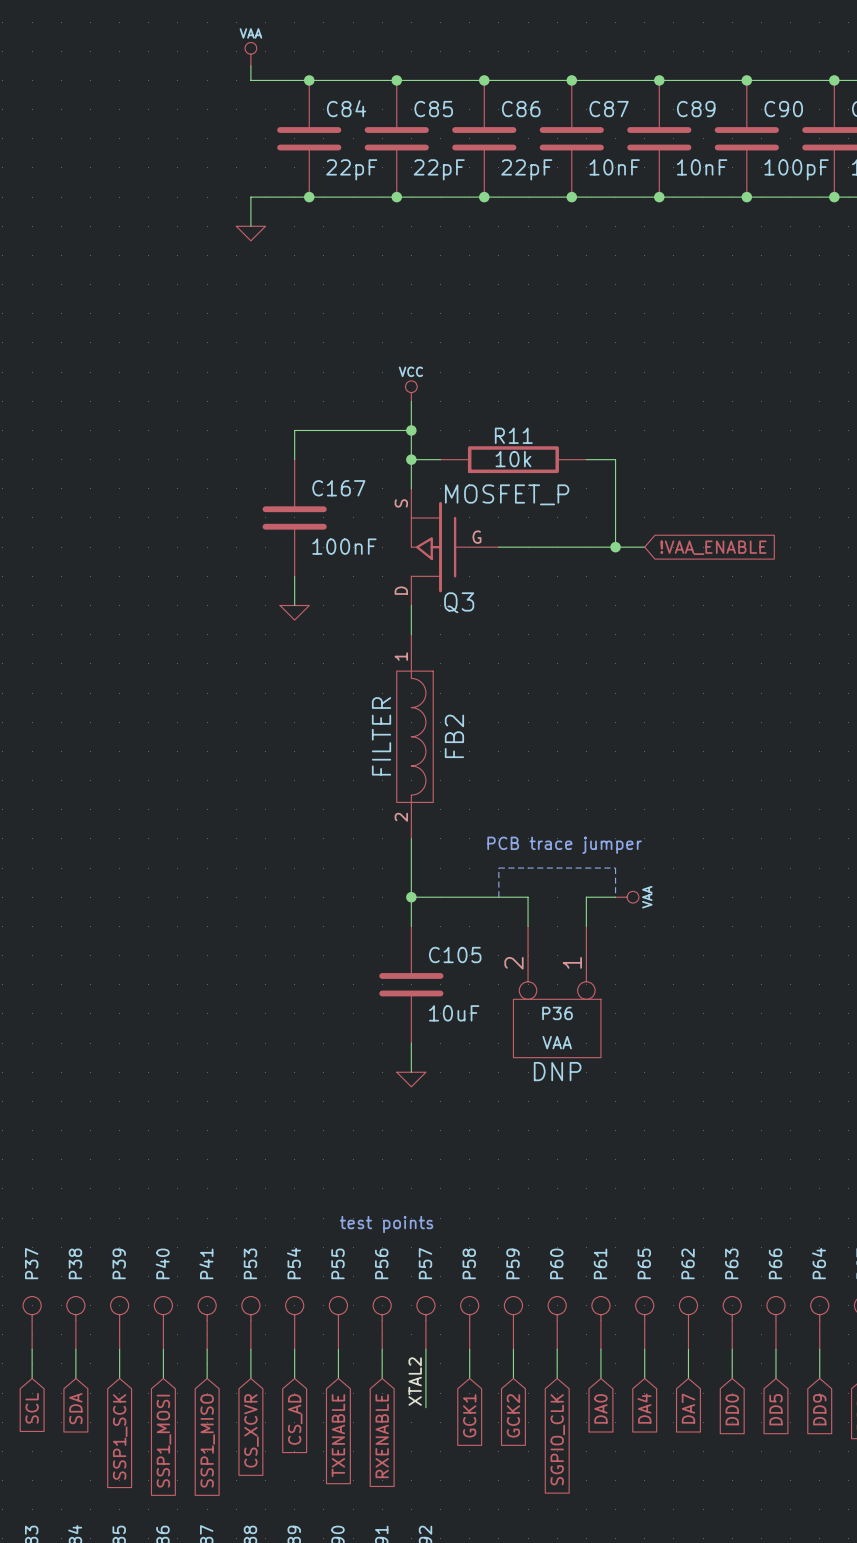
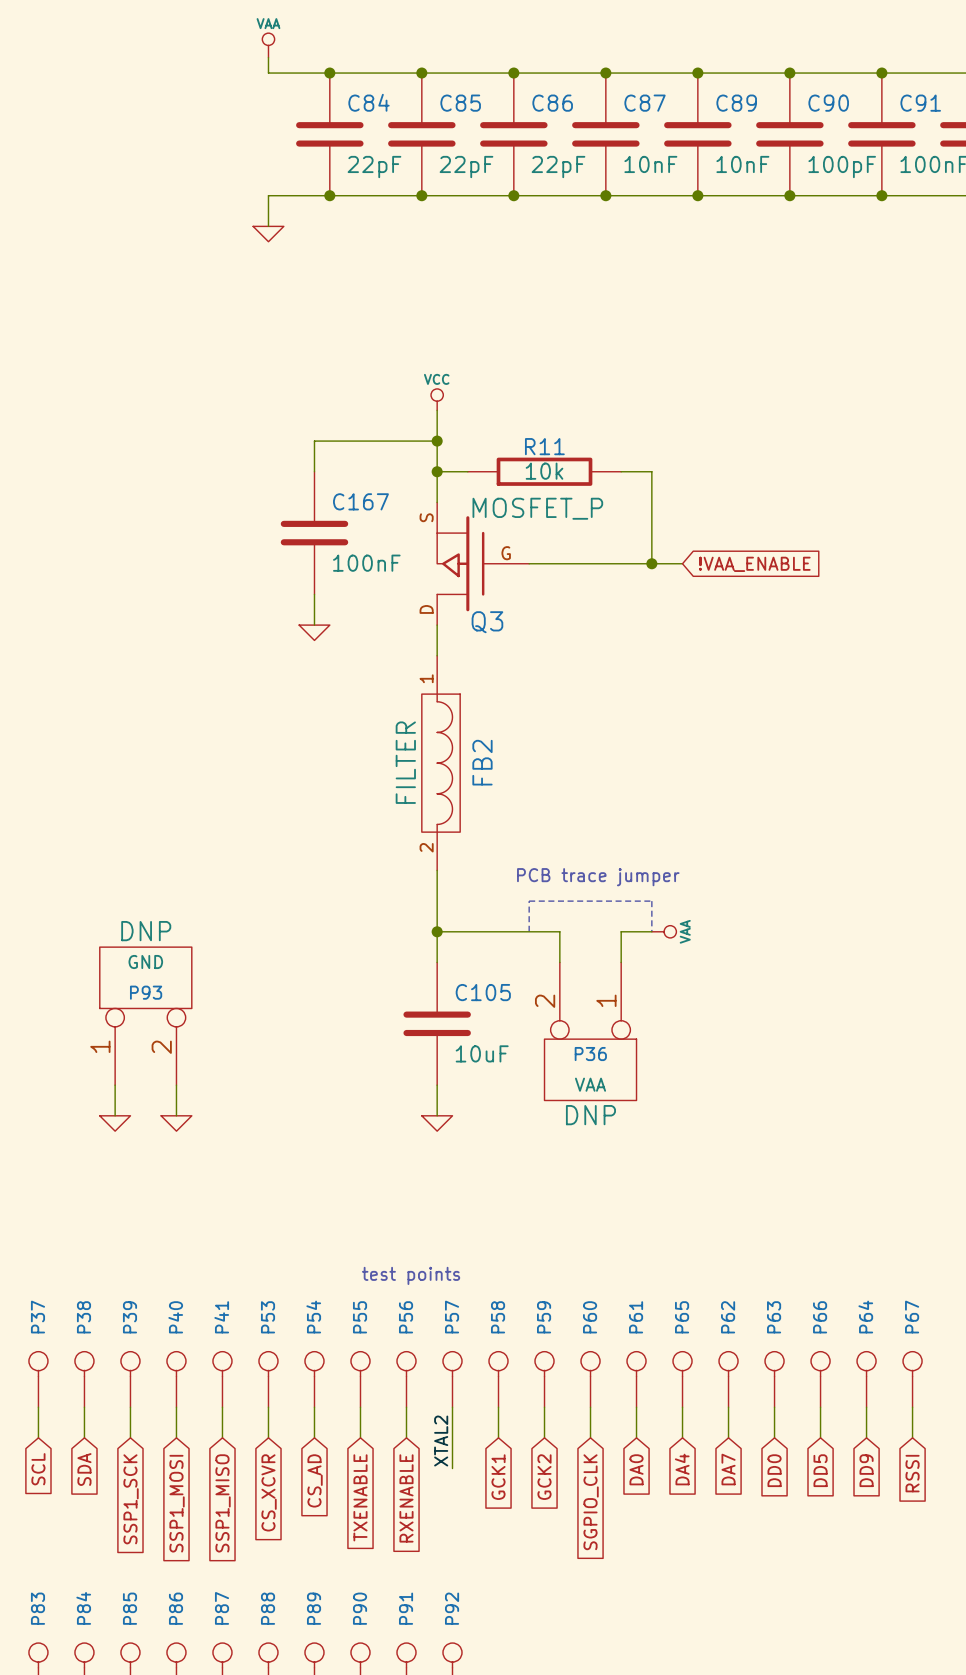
P93: none -> GND (145, 1016)
wire: none -> (115, 1085) (115, 1115)
wire: none -> (176, 1085) (176, 1115)
power symbol: none -> (115, 1123)
power symbol: none -> (176, 1123)

